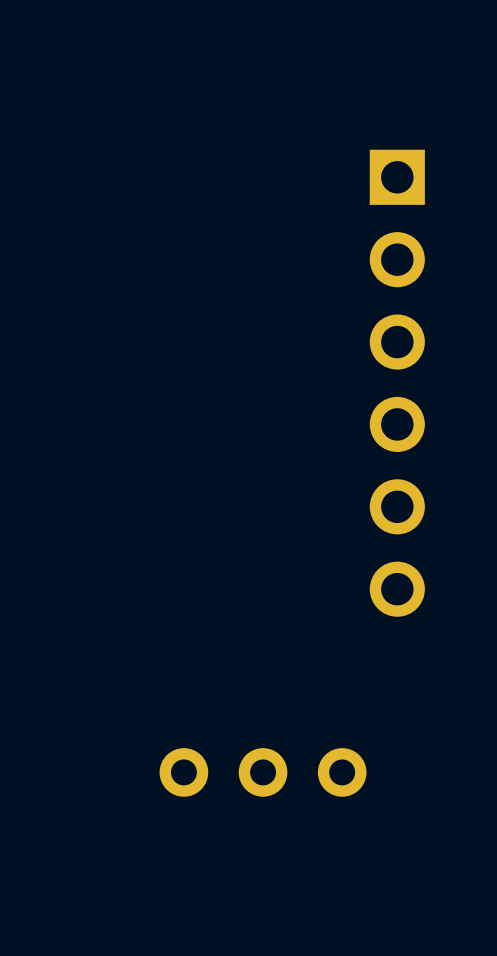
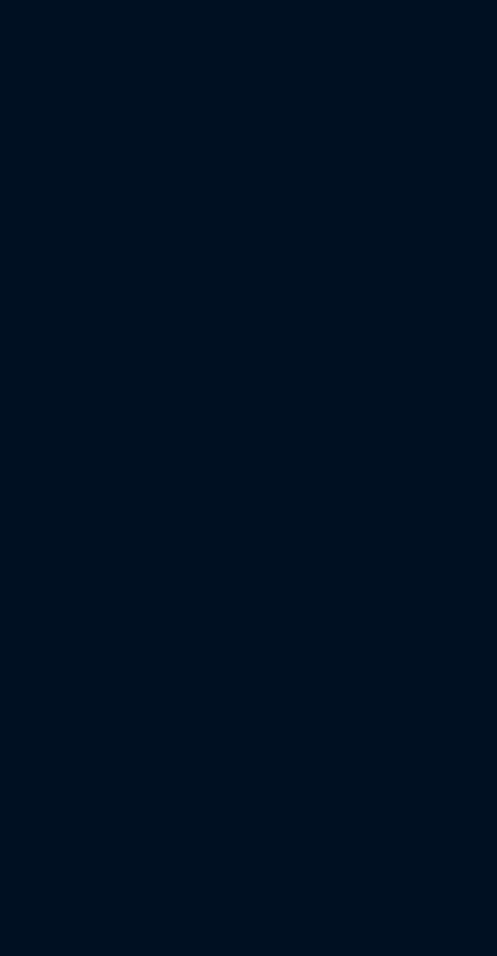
part: (397, 383) -> none
part: (263, 772) -> none

